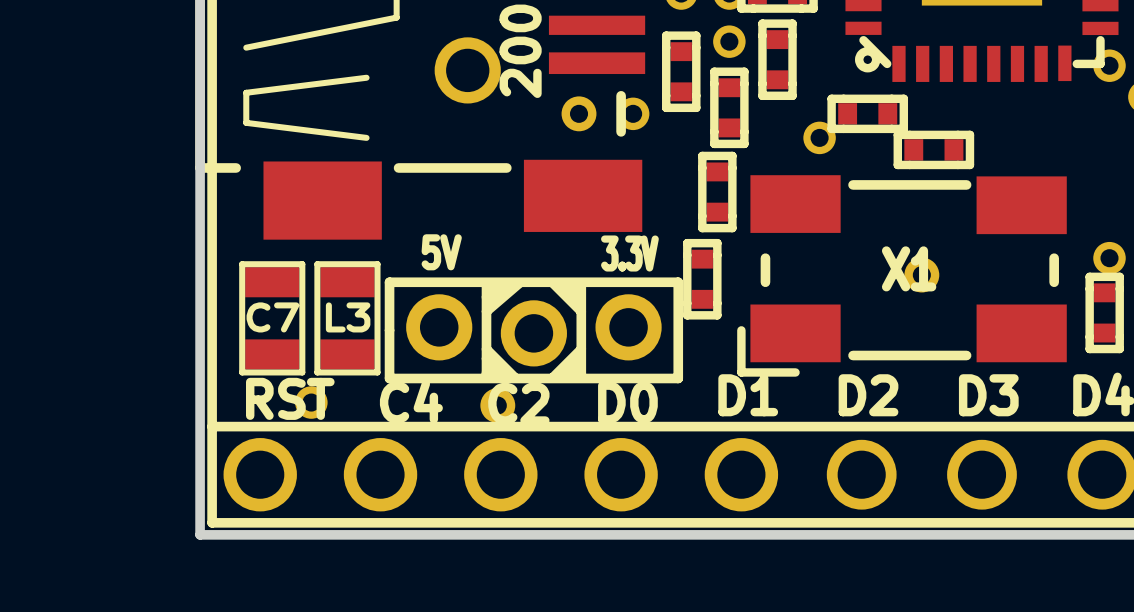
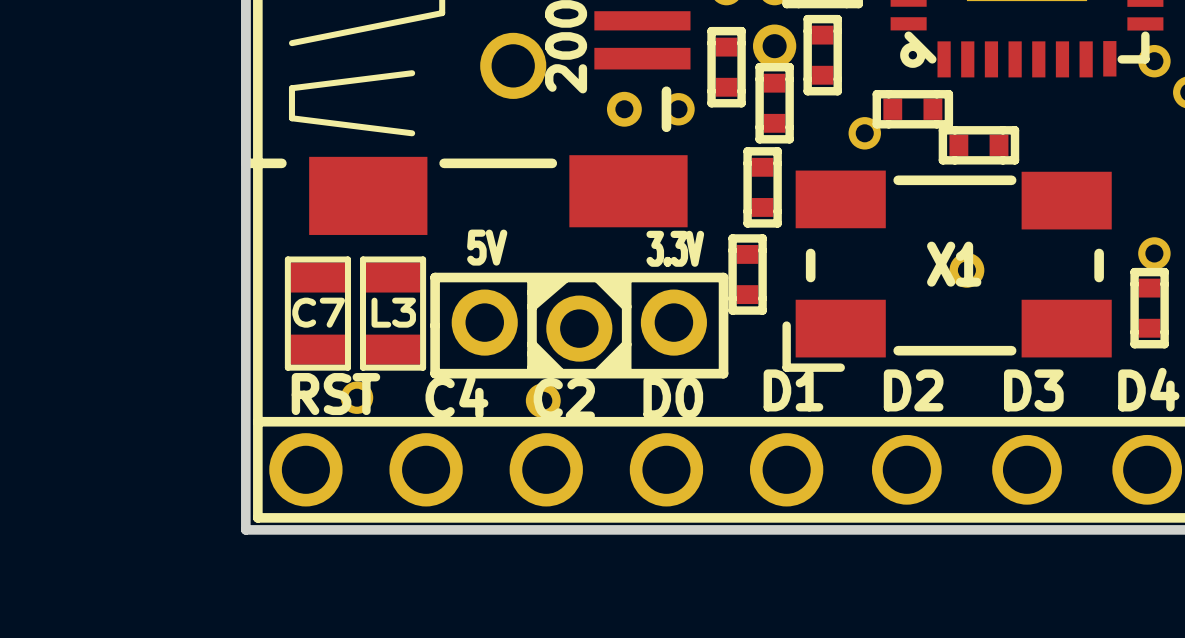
part footprint: [713, 25, 746, 58] -> [753, 24, 797, 68]

